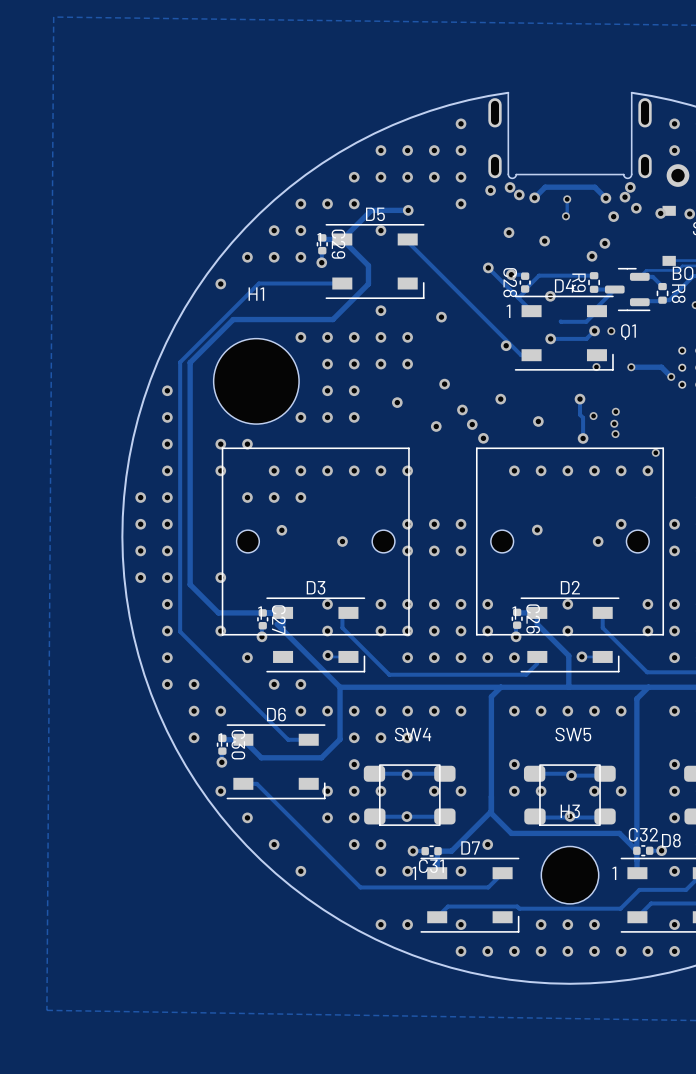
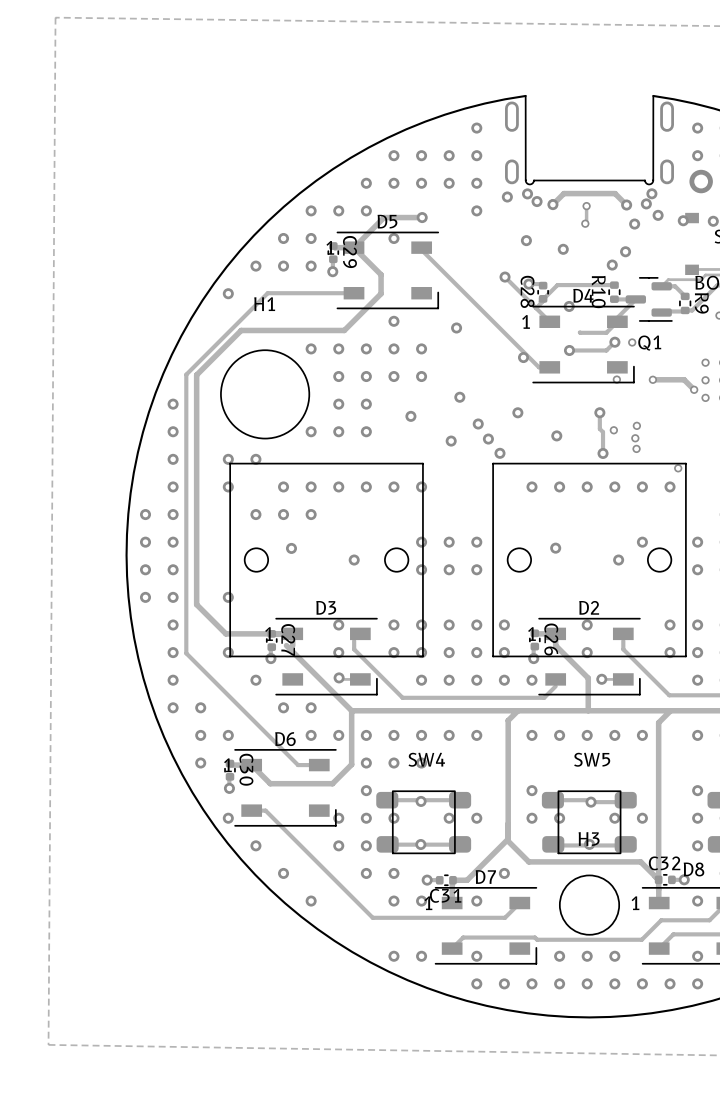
R9 name: R9 (578, 282) -> R10 (598, 292)
R8 name: R8 (678, 293) -> R9 (701, 303)

